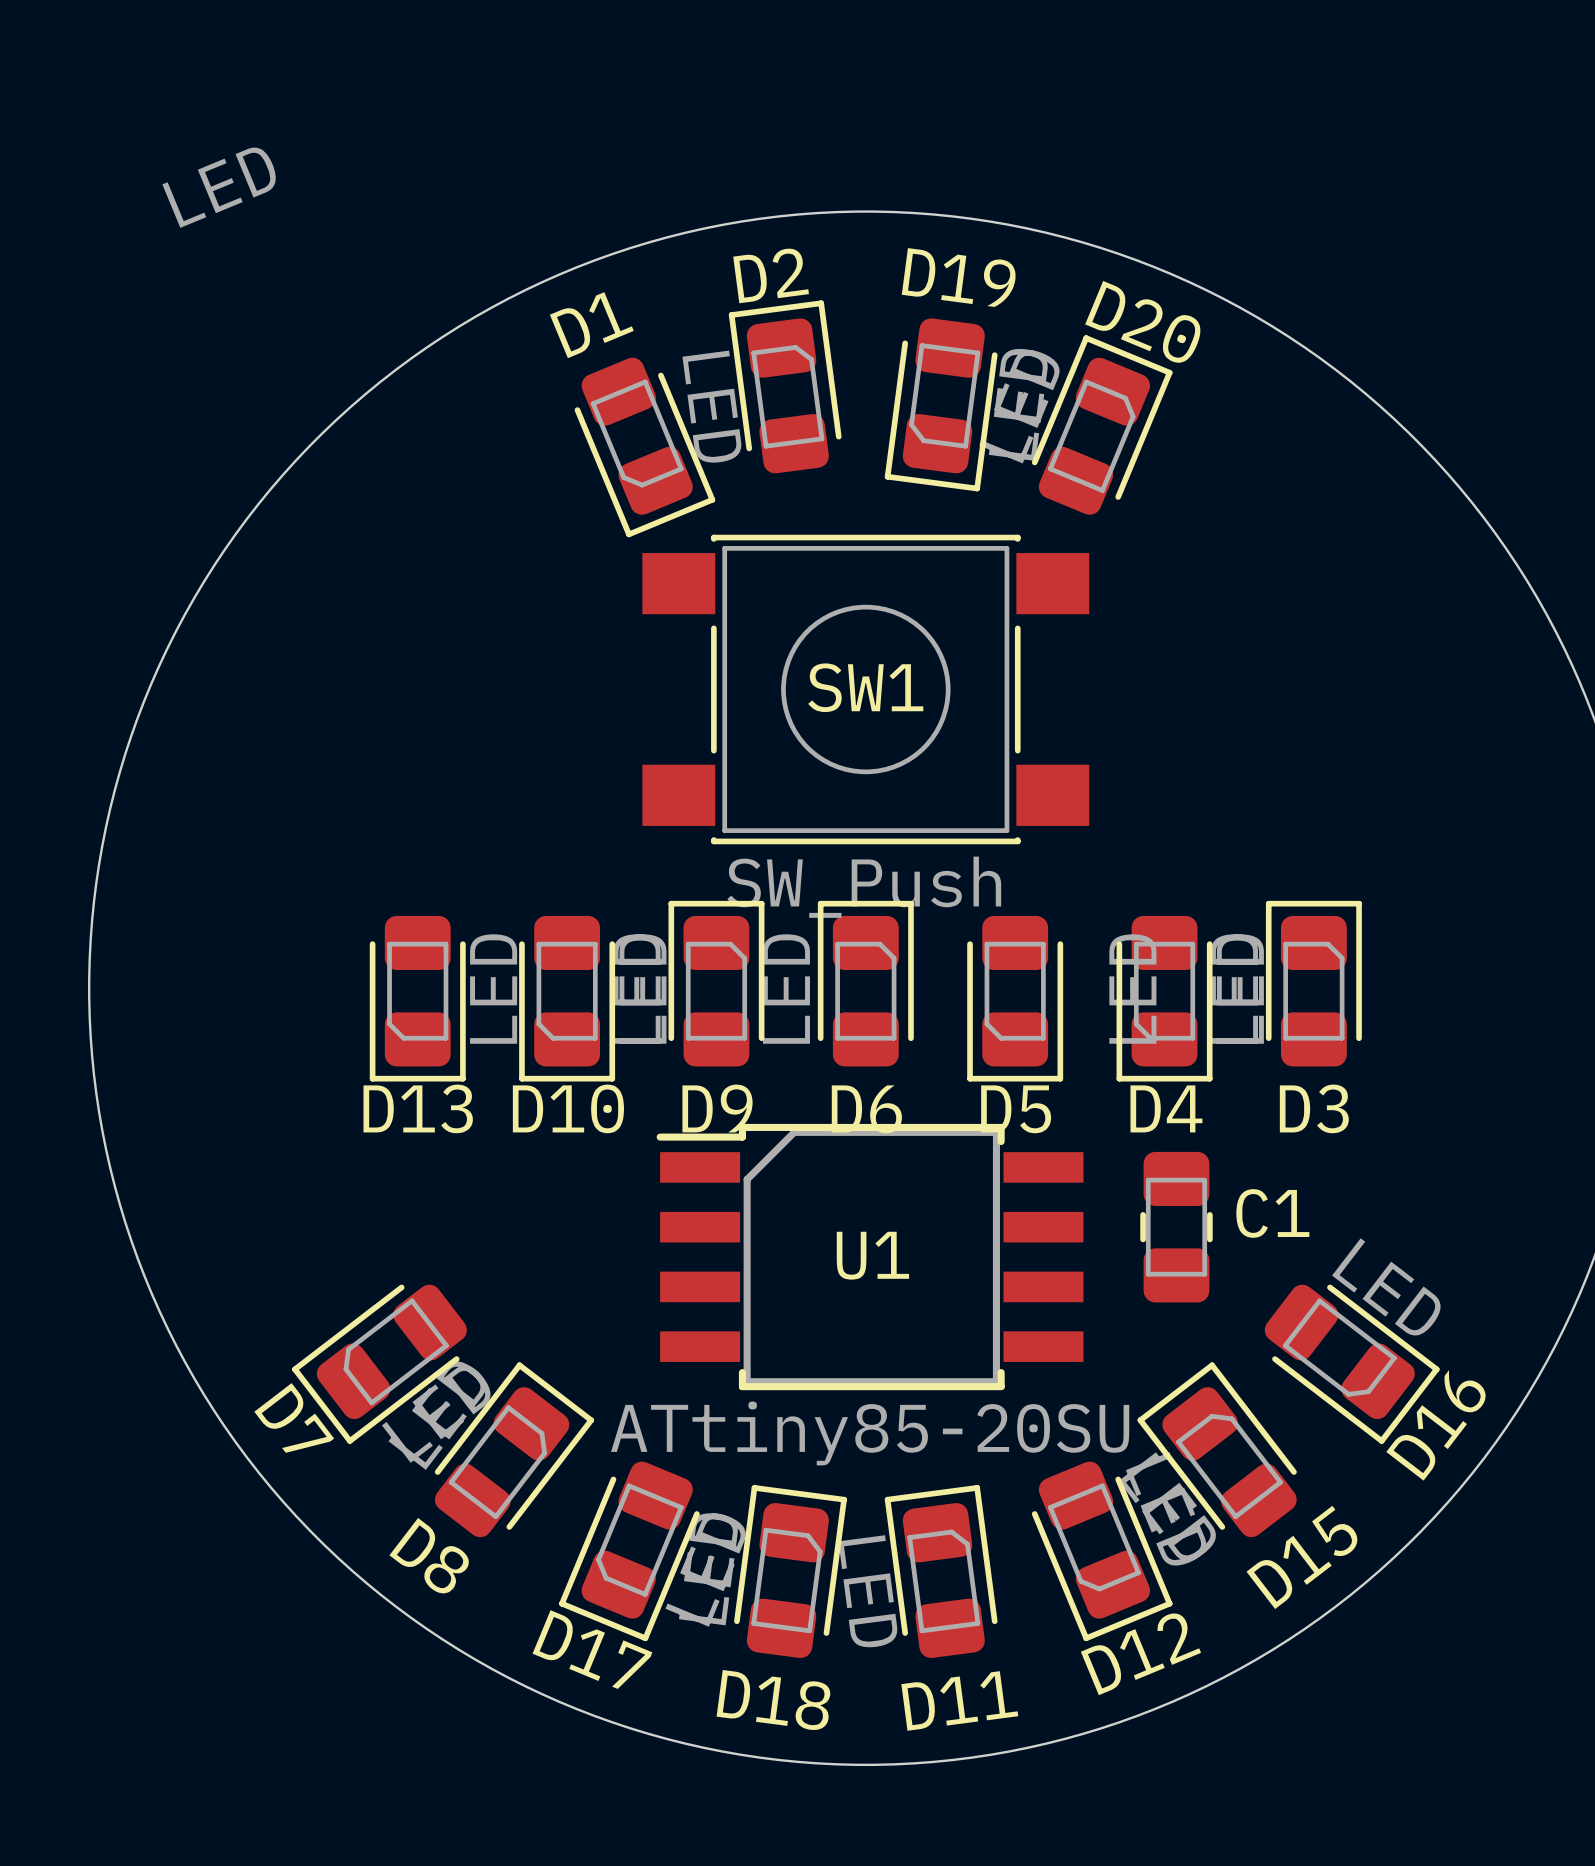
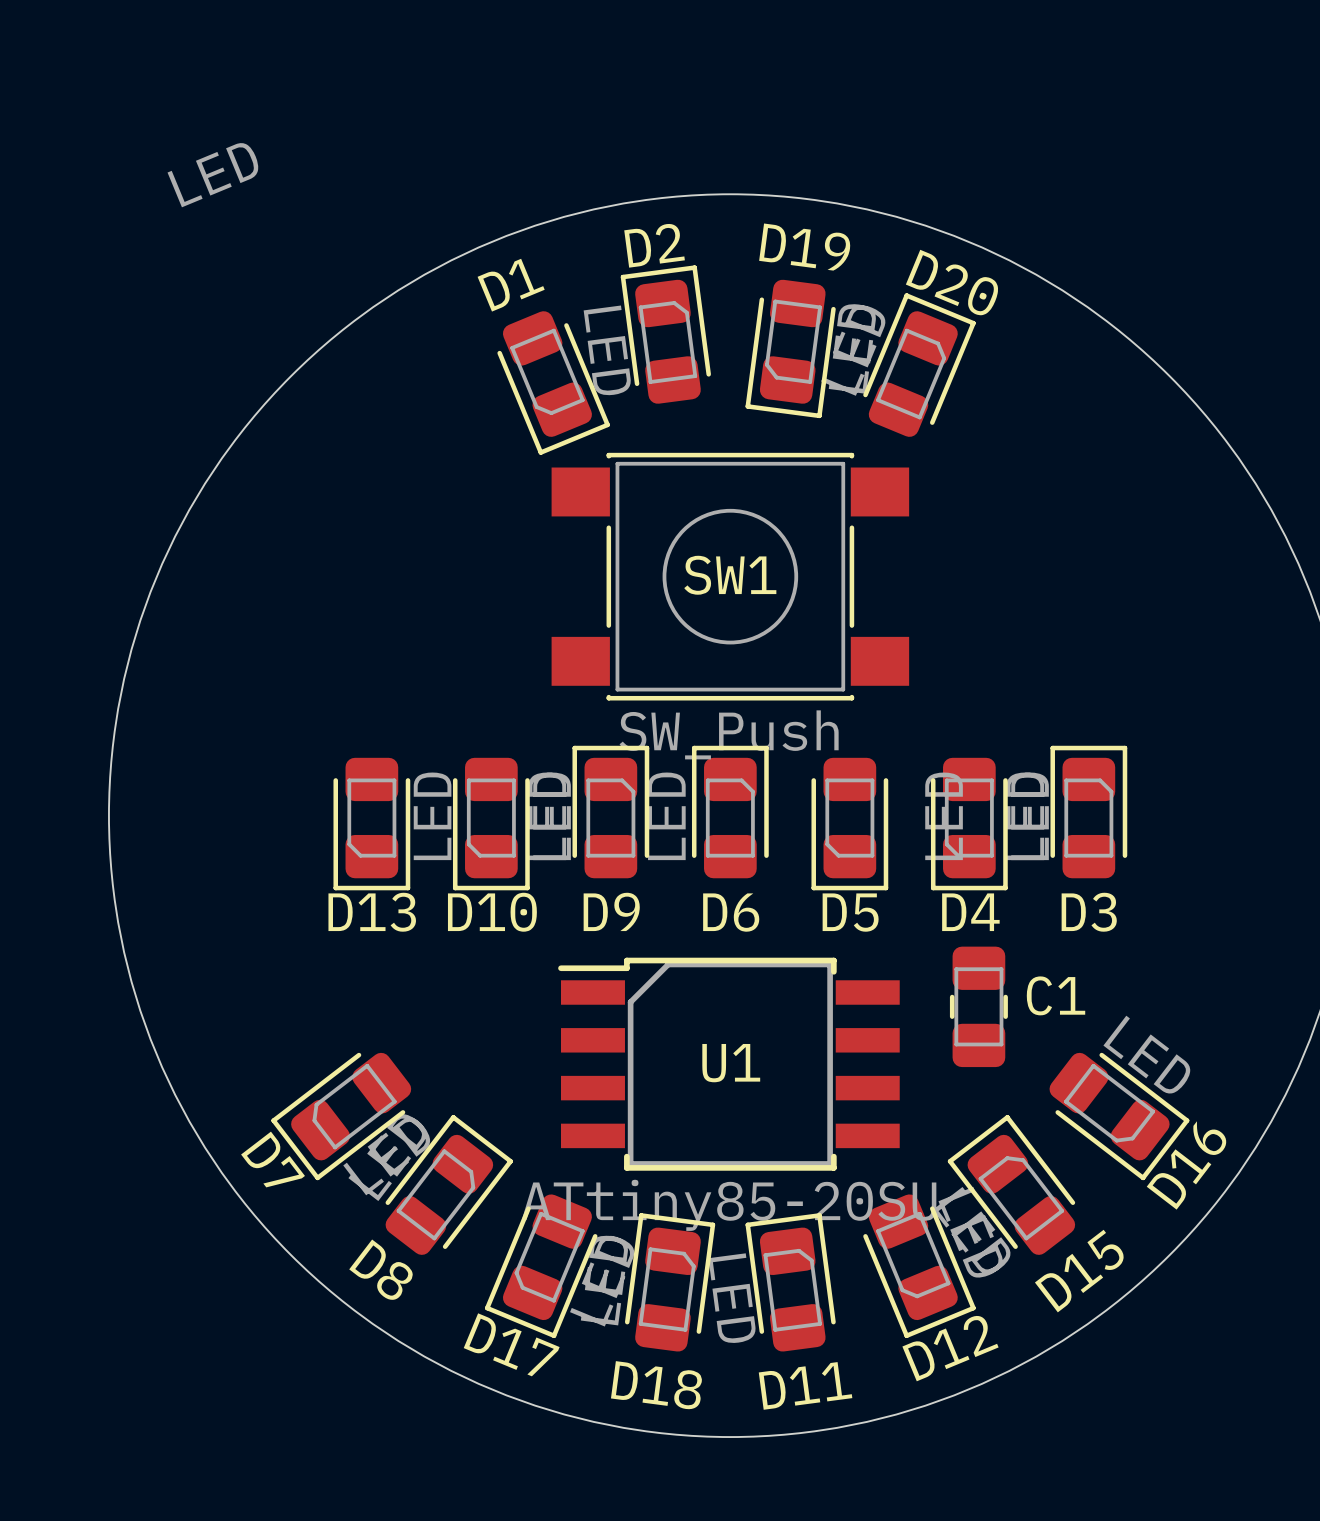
U1 position: (870, 1257) -> (728, 1064)

